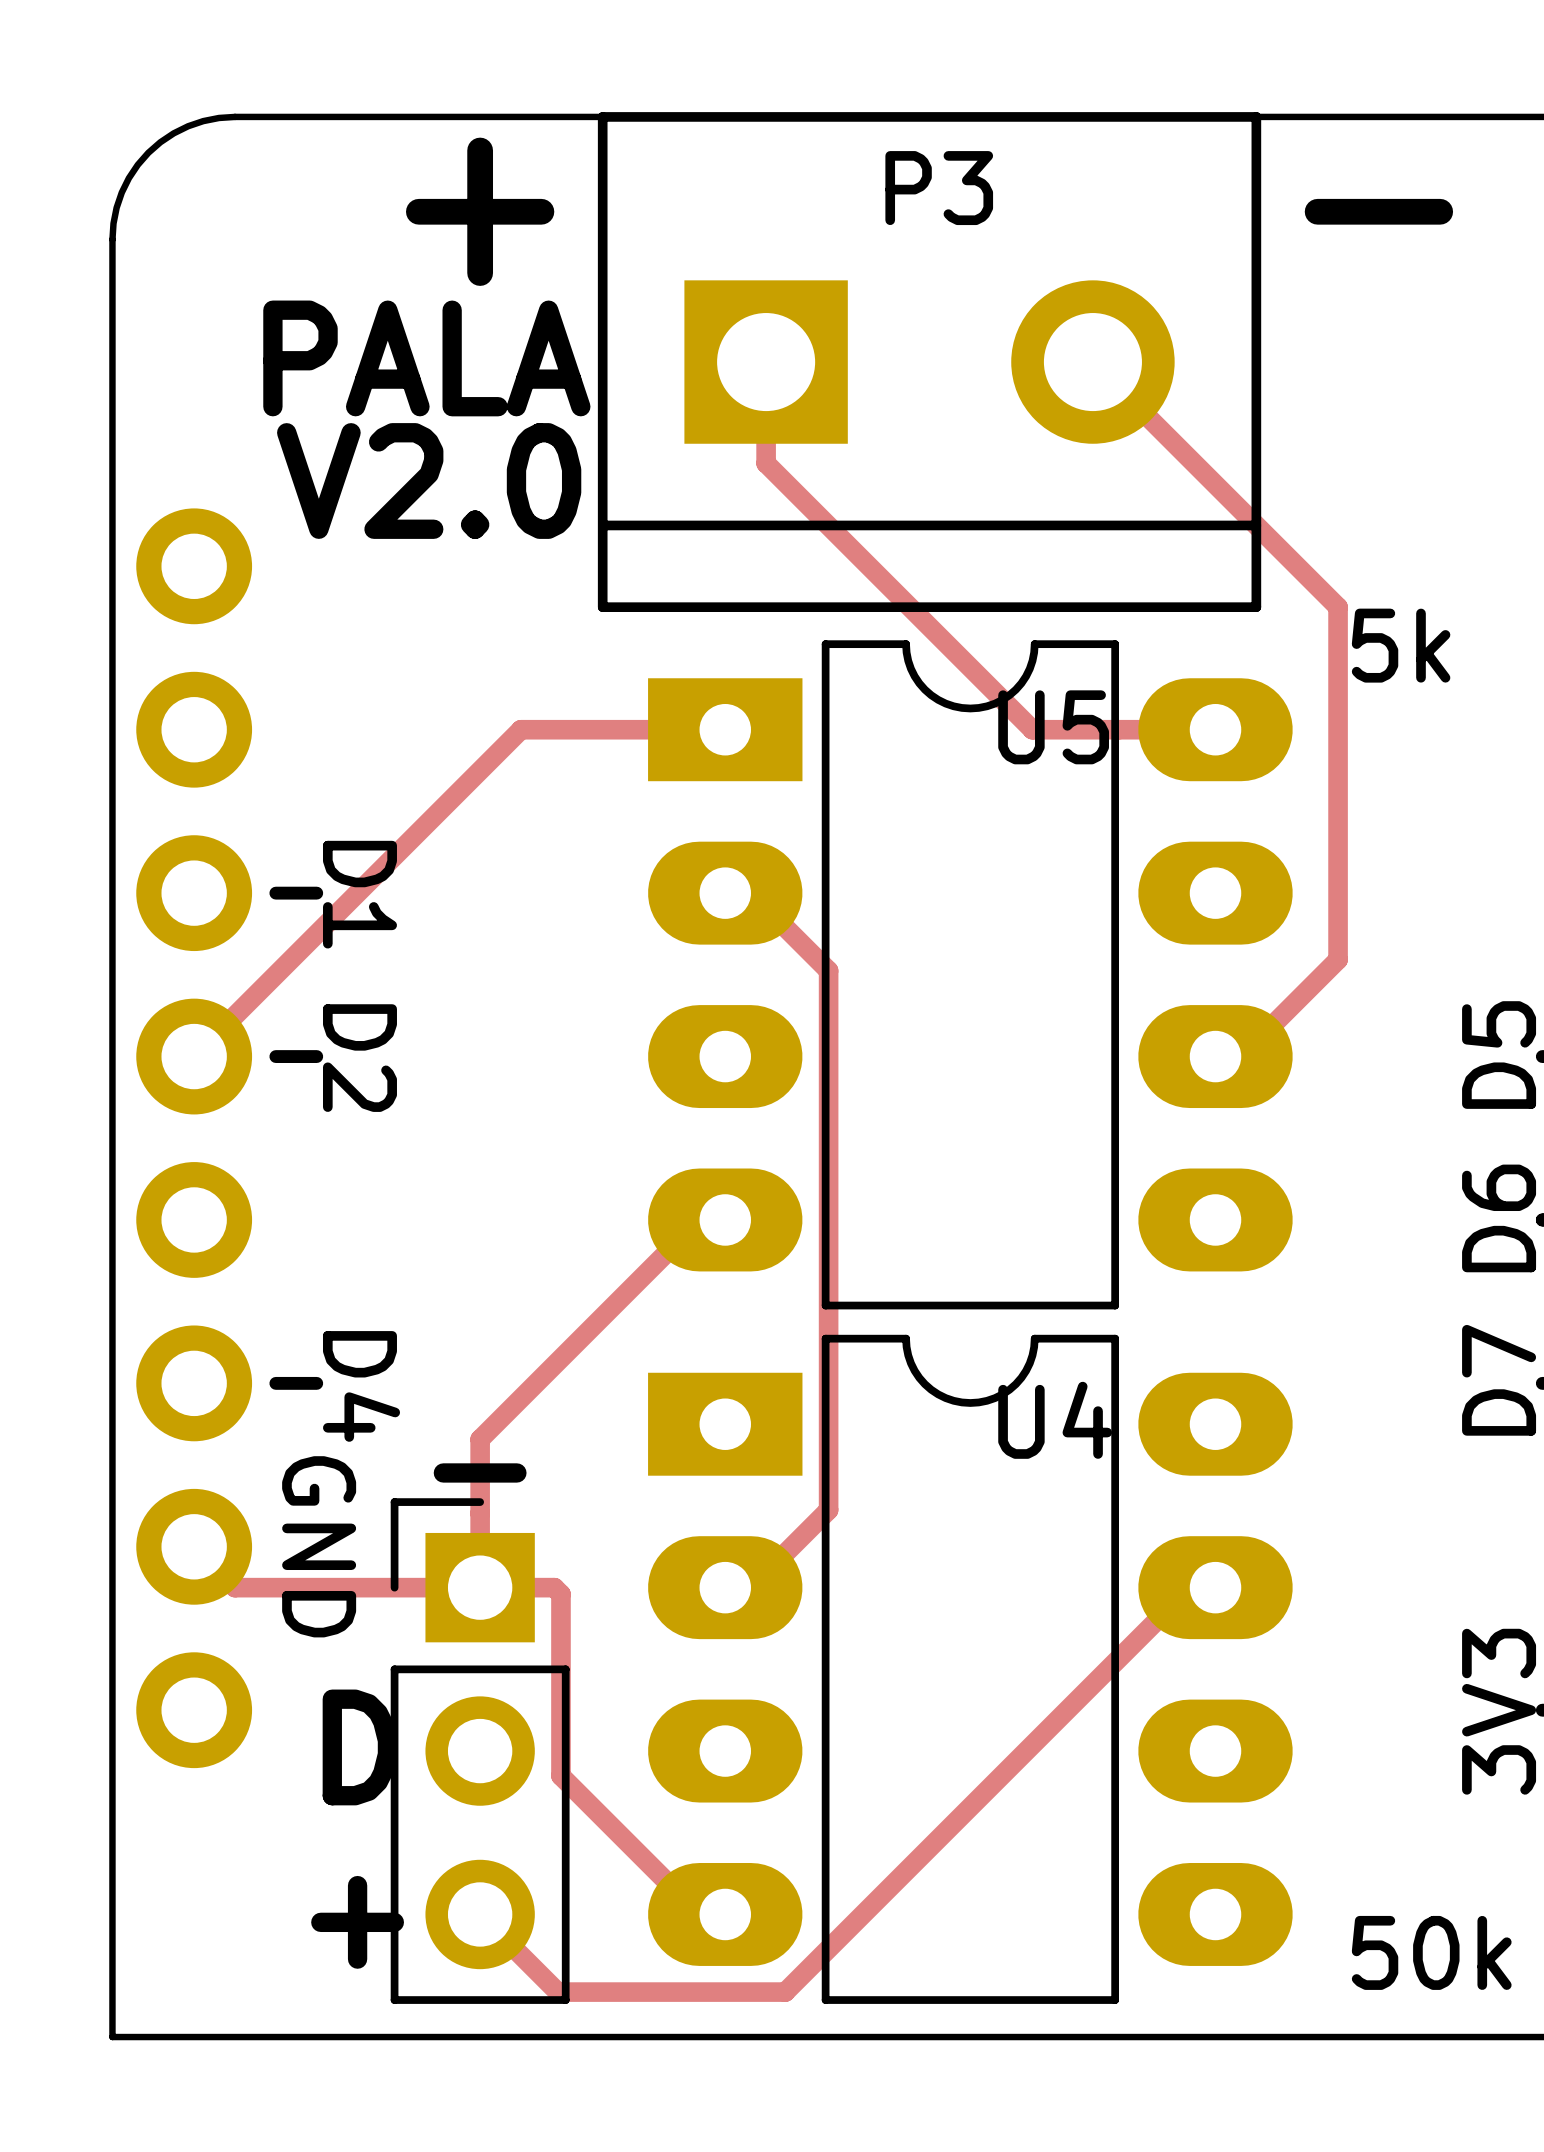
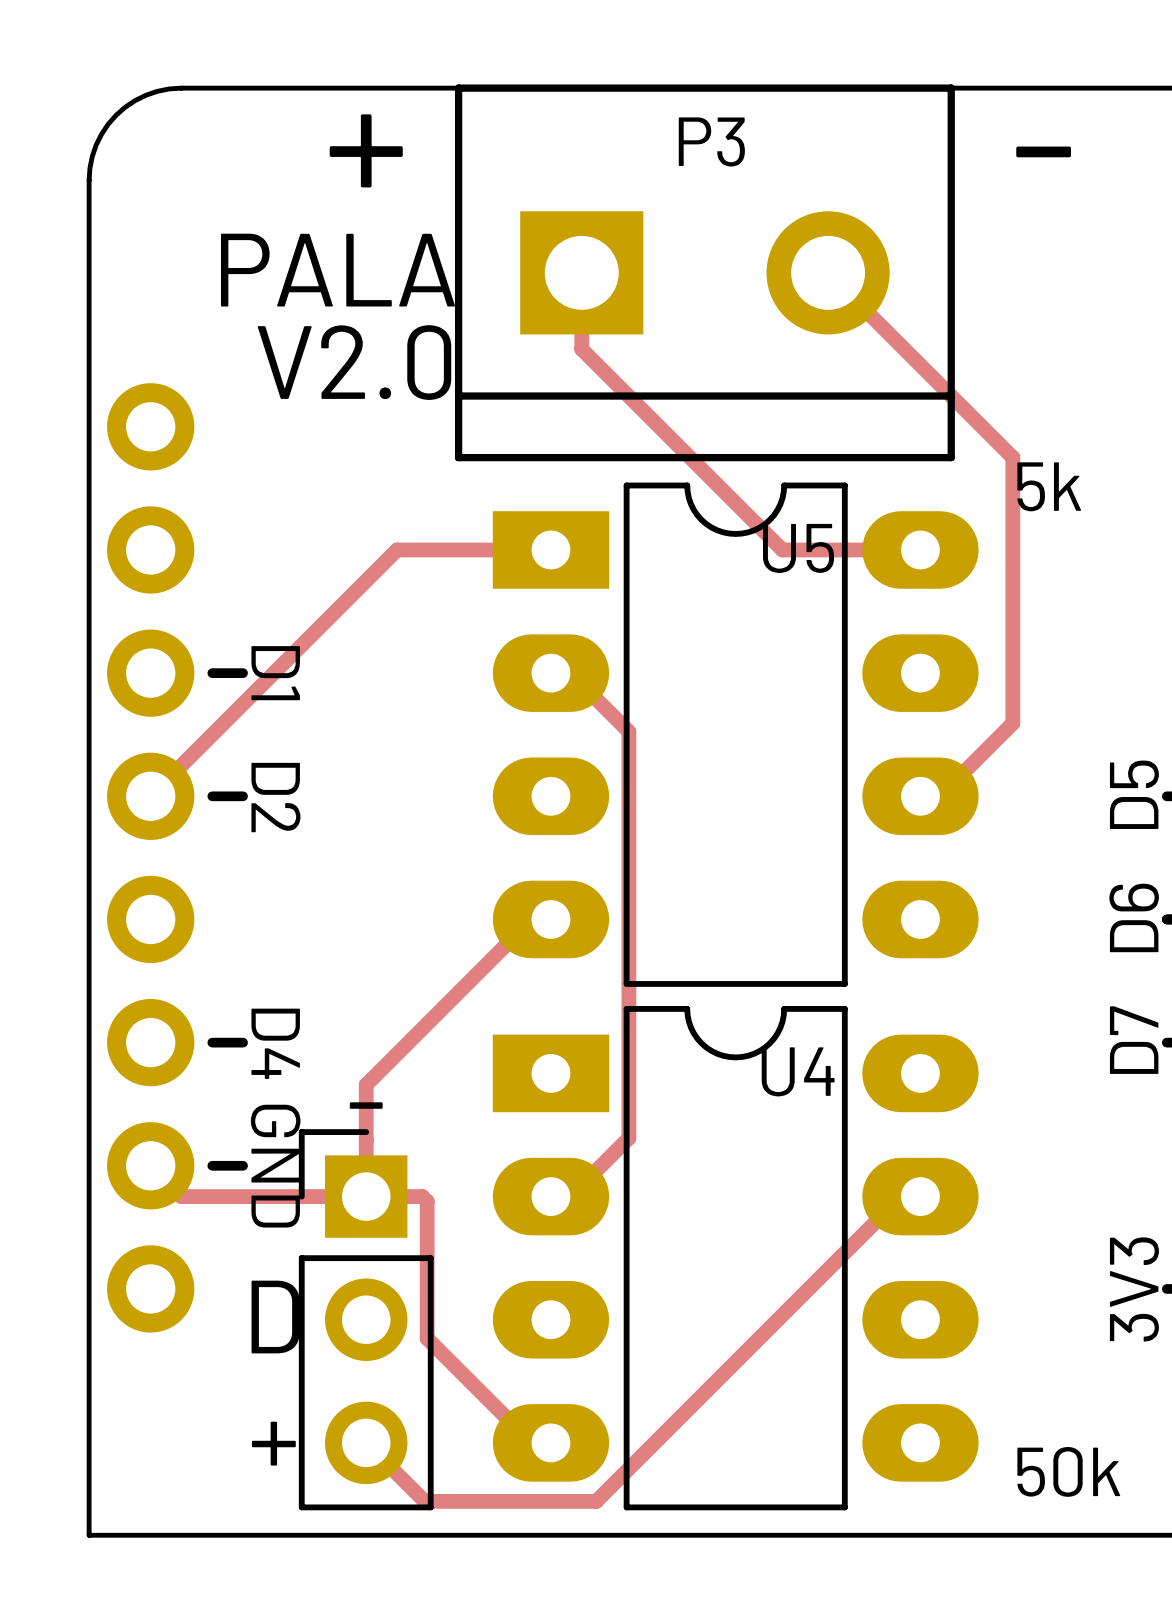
line: none -> (212, 1165) (243, 1165)
text position: GND (319, 1546) -> GND (275, 1166)

